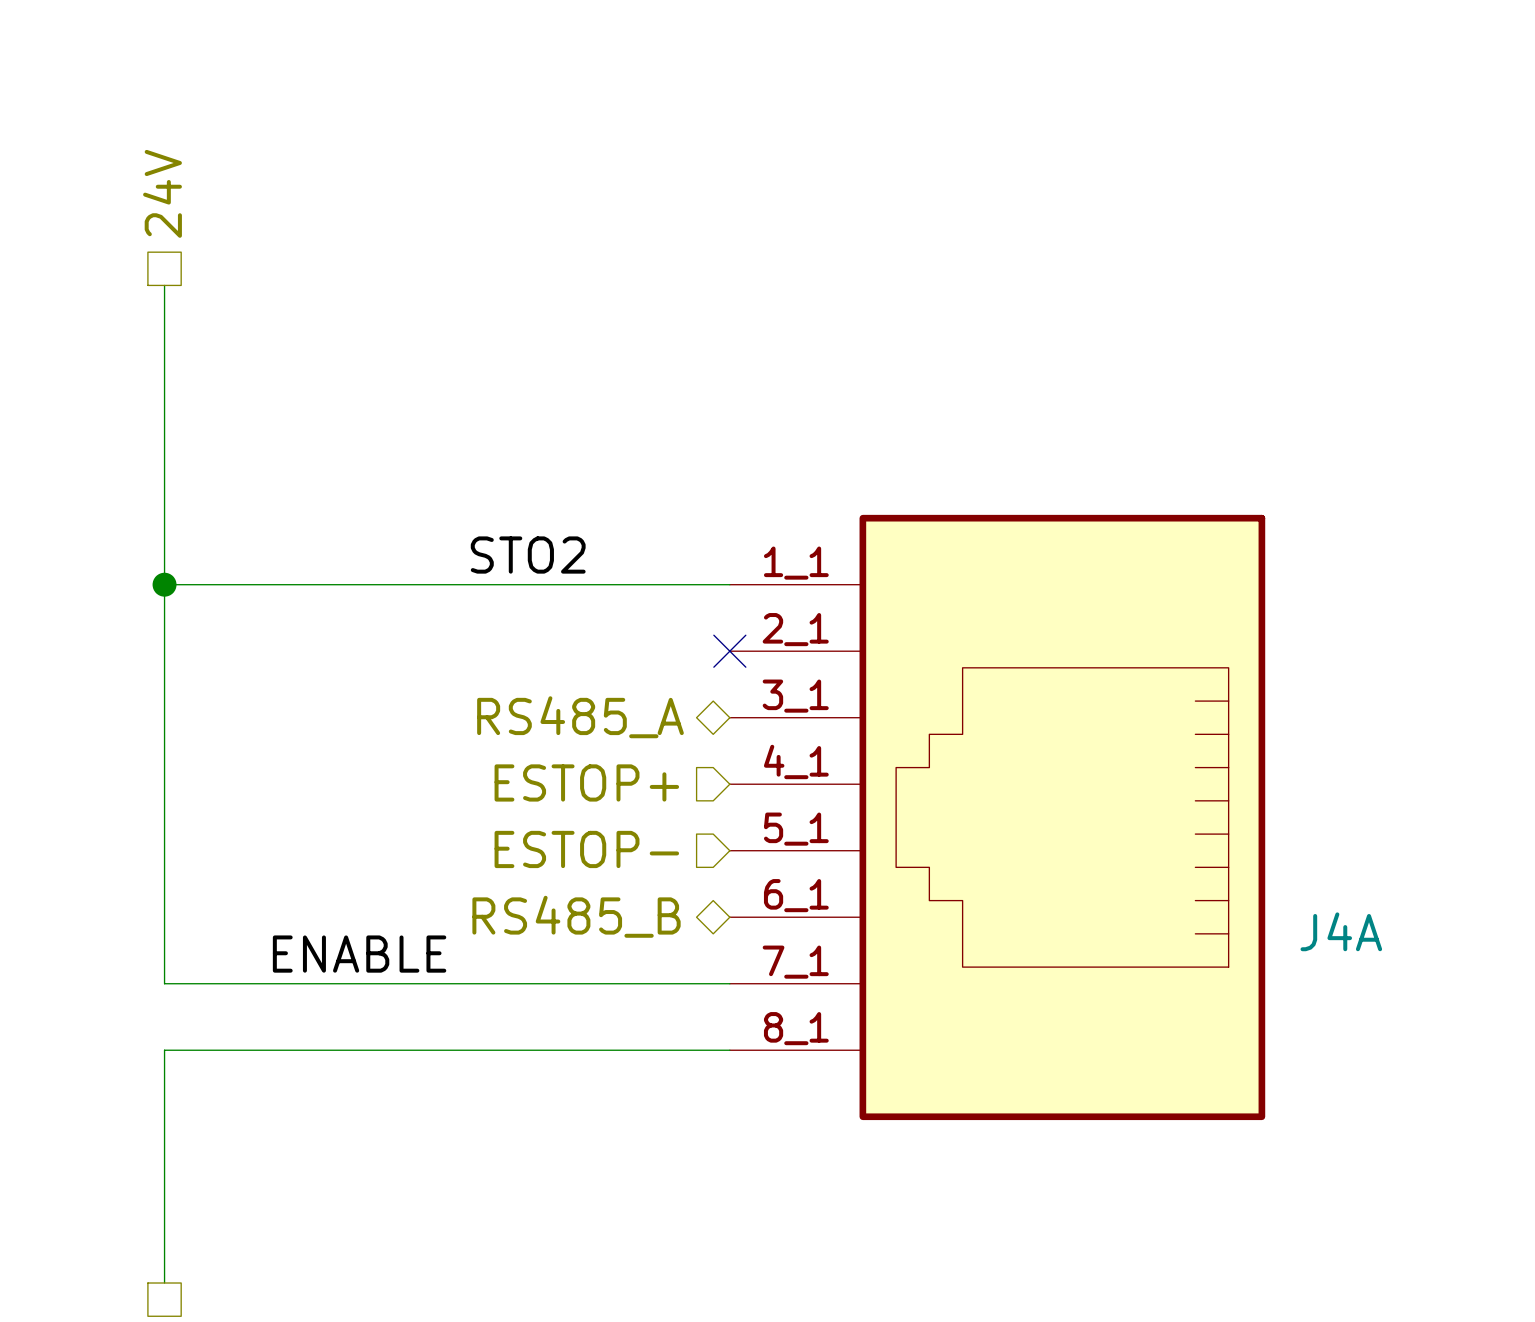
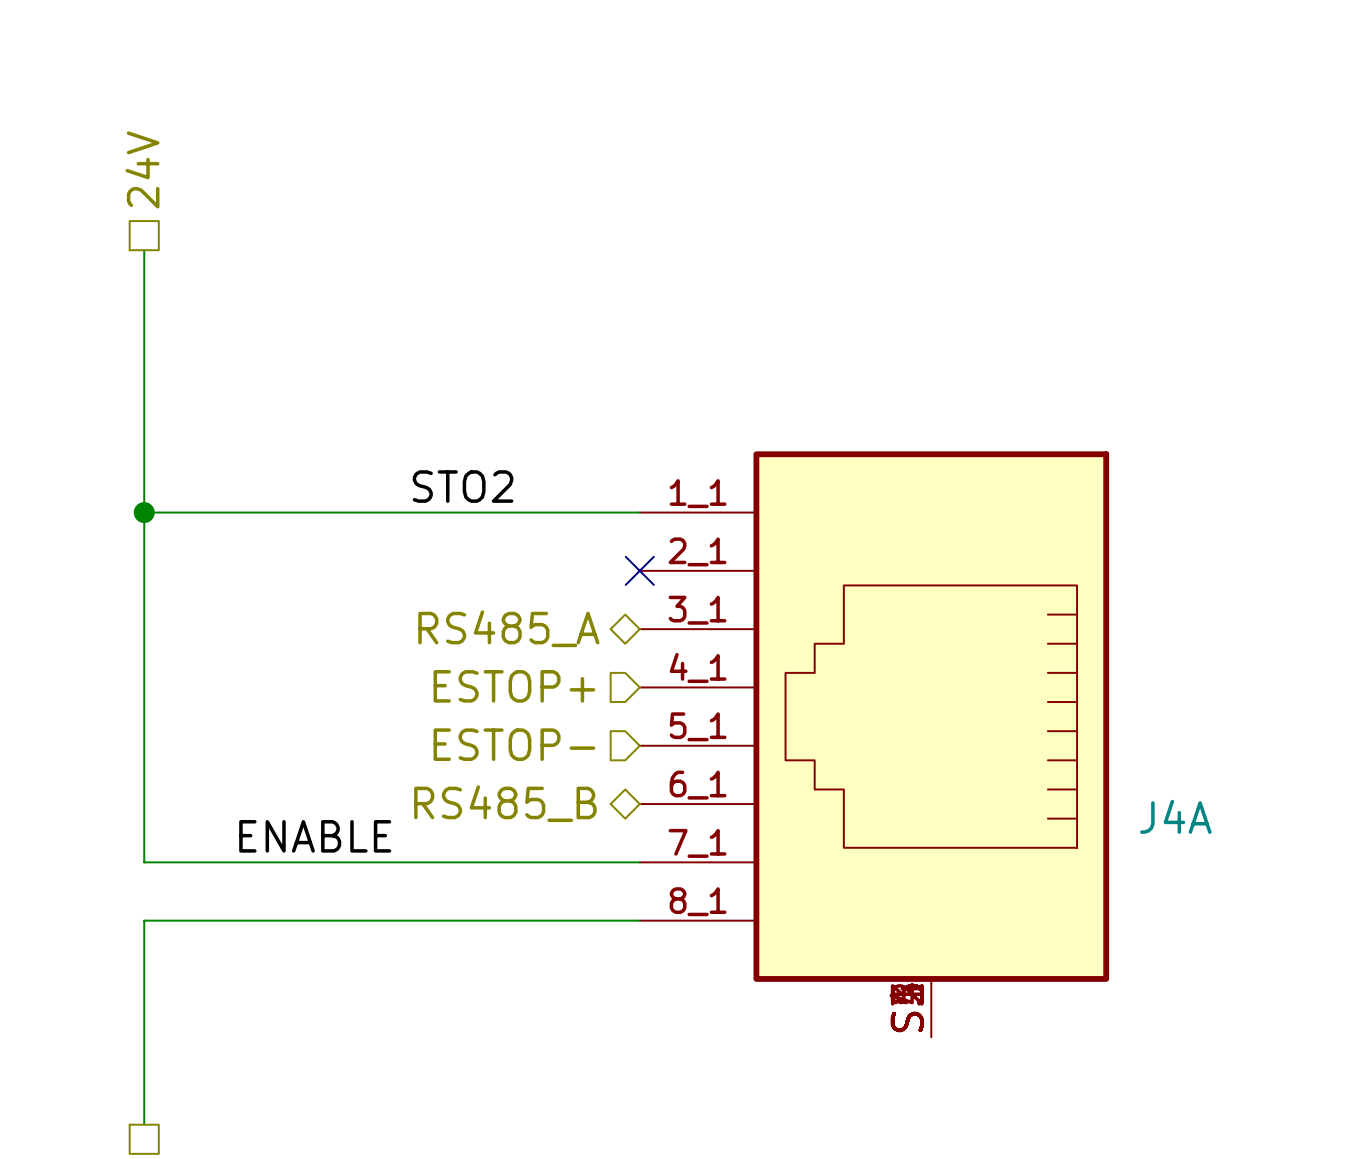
J4A symbol: [729, 514, 1266, 1121] -> [639, 451, 1110, 1038]

